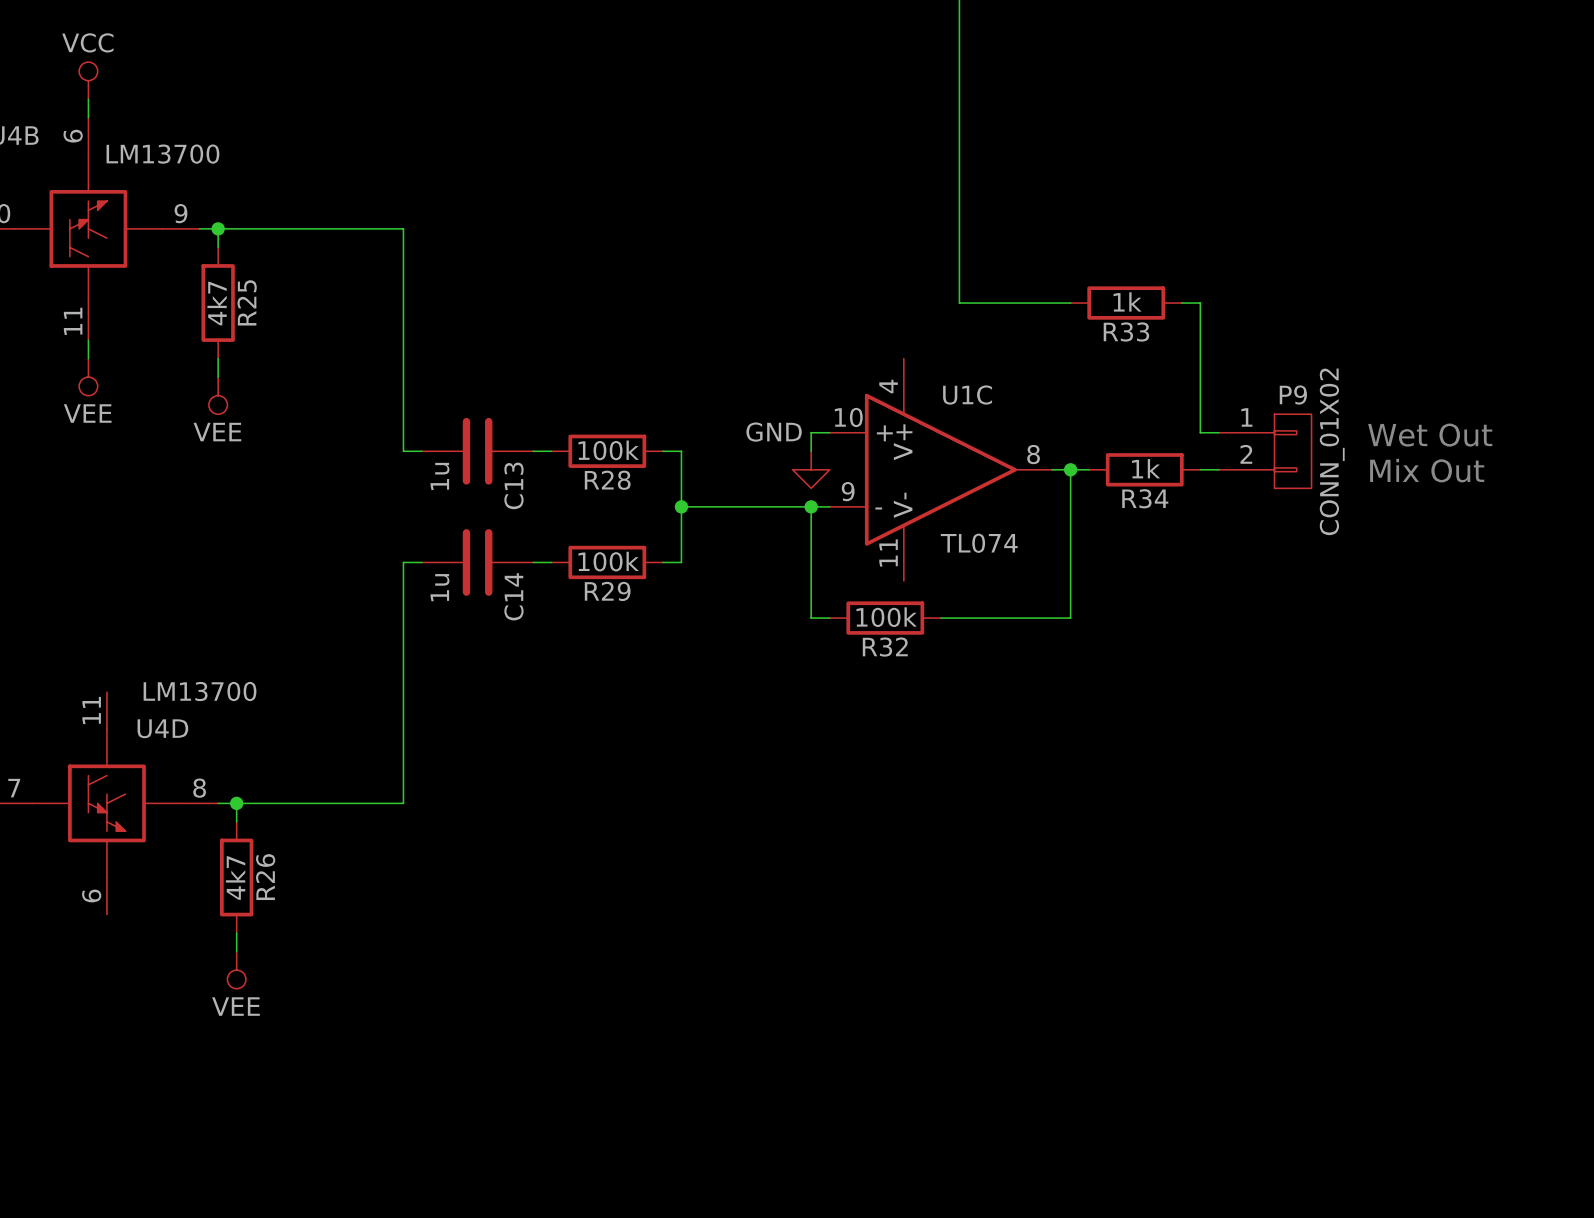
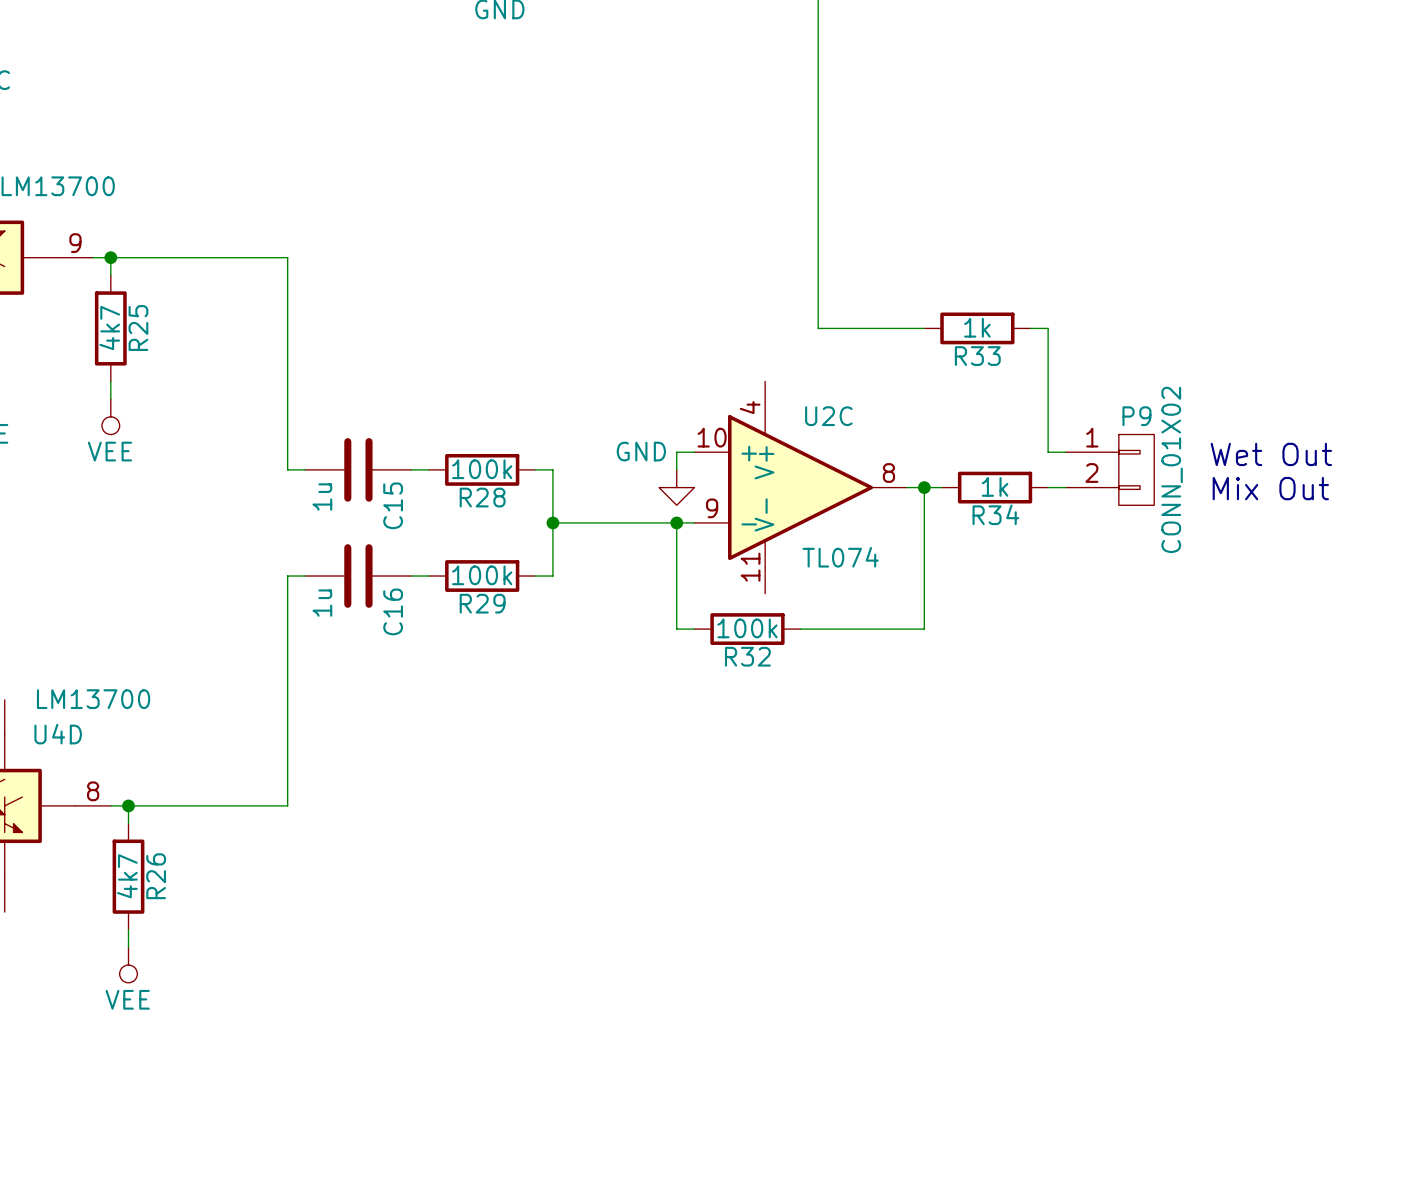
U1C name: U1C (967, 395) -> U2C (828, 416)
C13 name: C13 (513, 485) -> C15 (393, 505)
C14 name: C14 (513, 596) -> C16 (393, 611)

